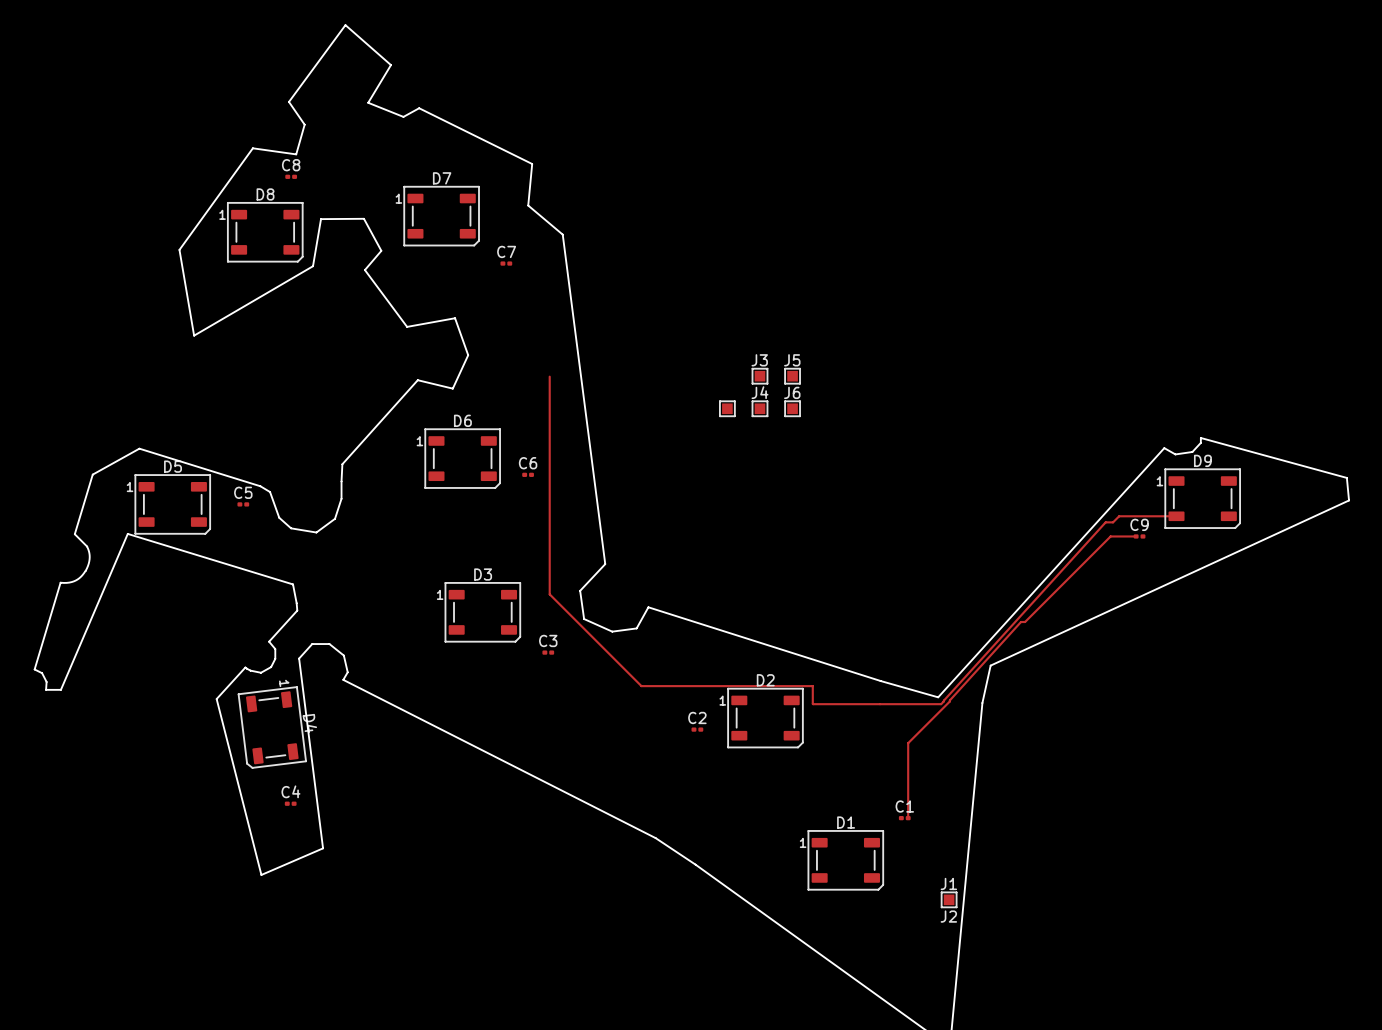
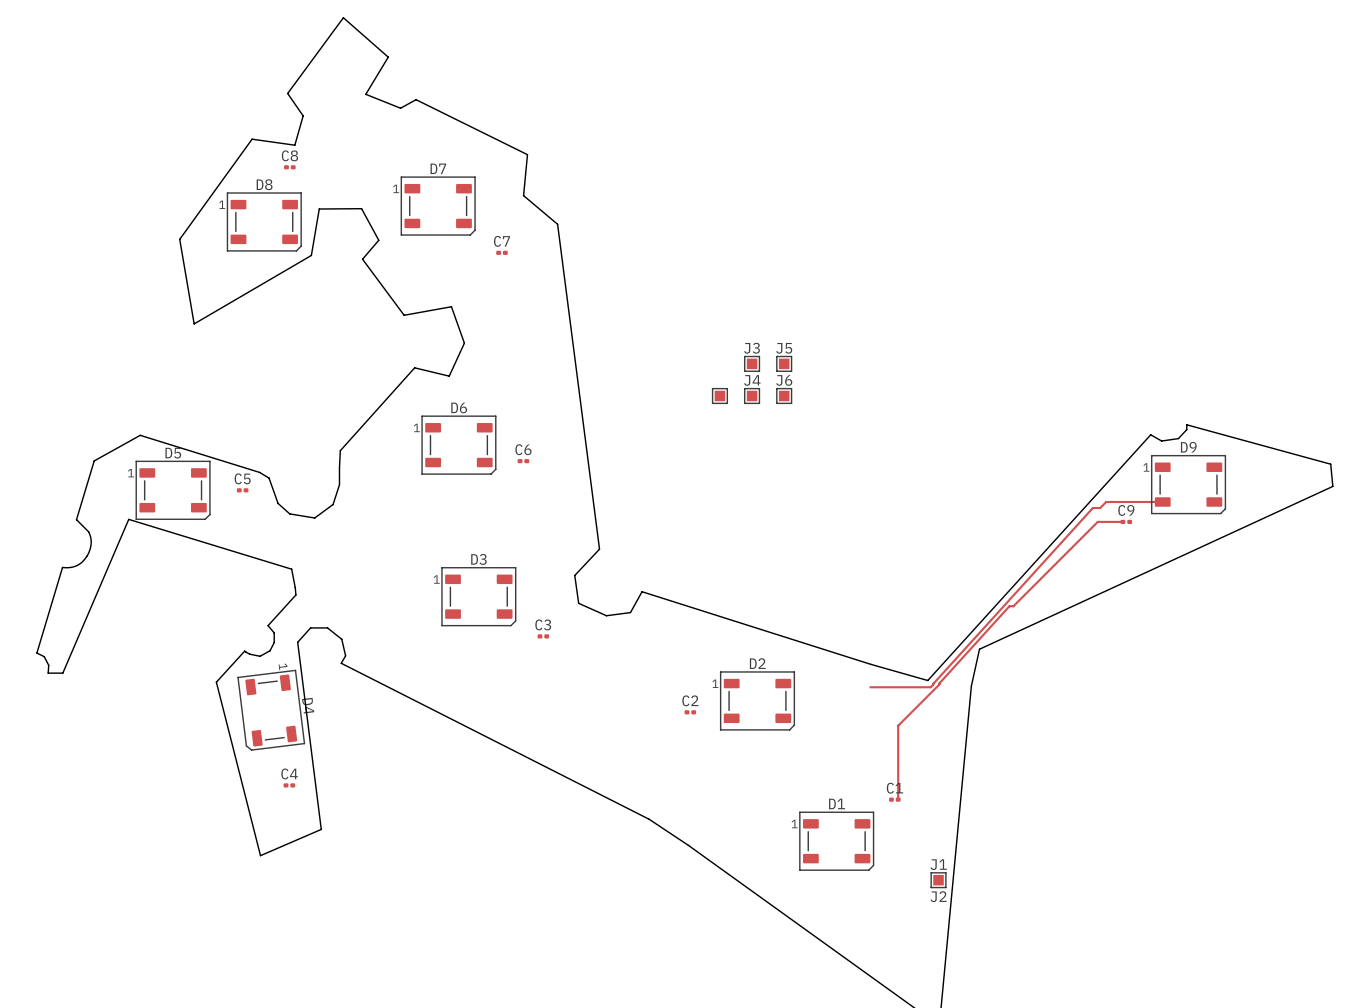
top track: (549, 376) (549, 594) (641, 686) (812, 686) (813, 704) (879, 704) -> none

